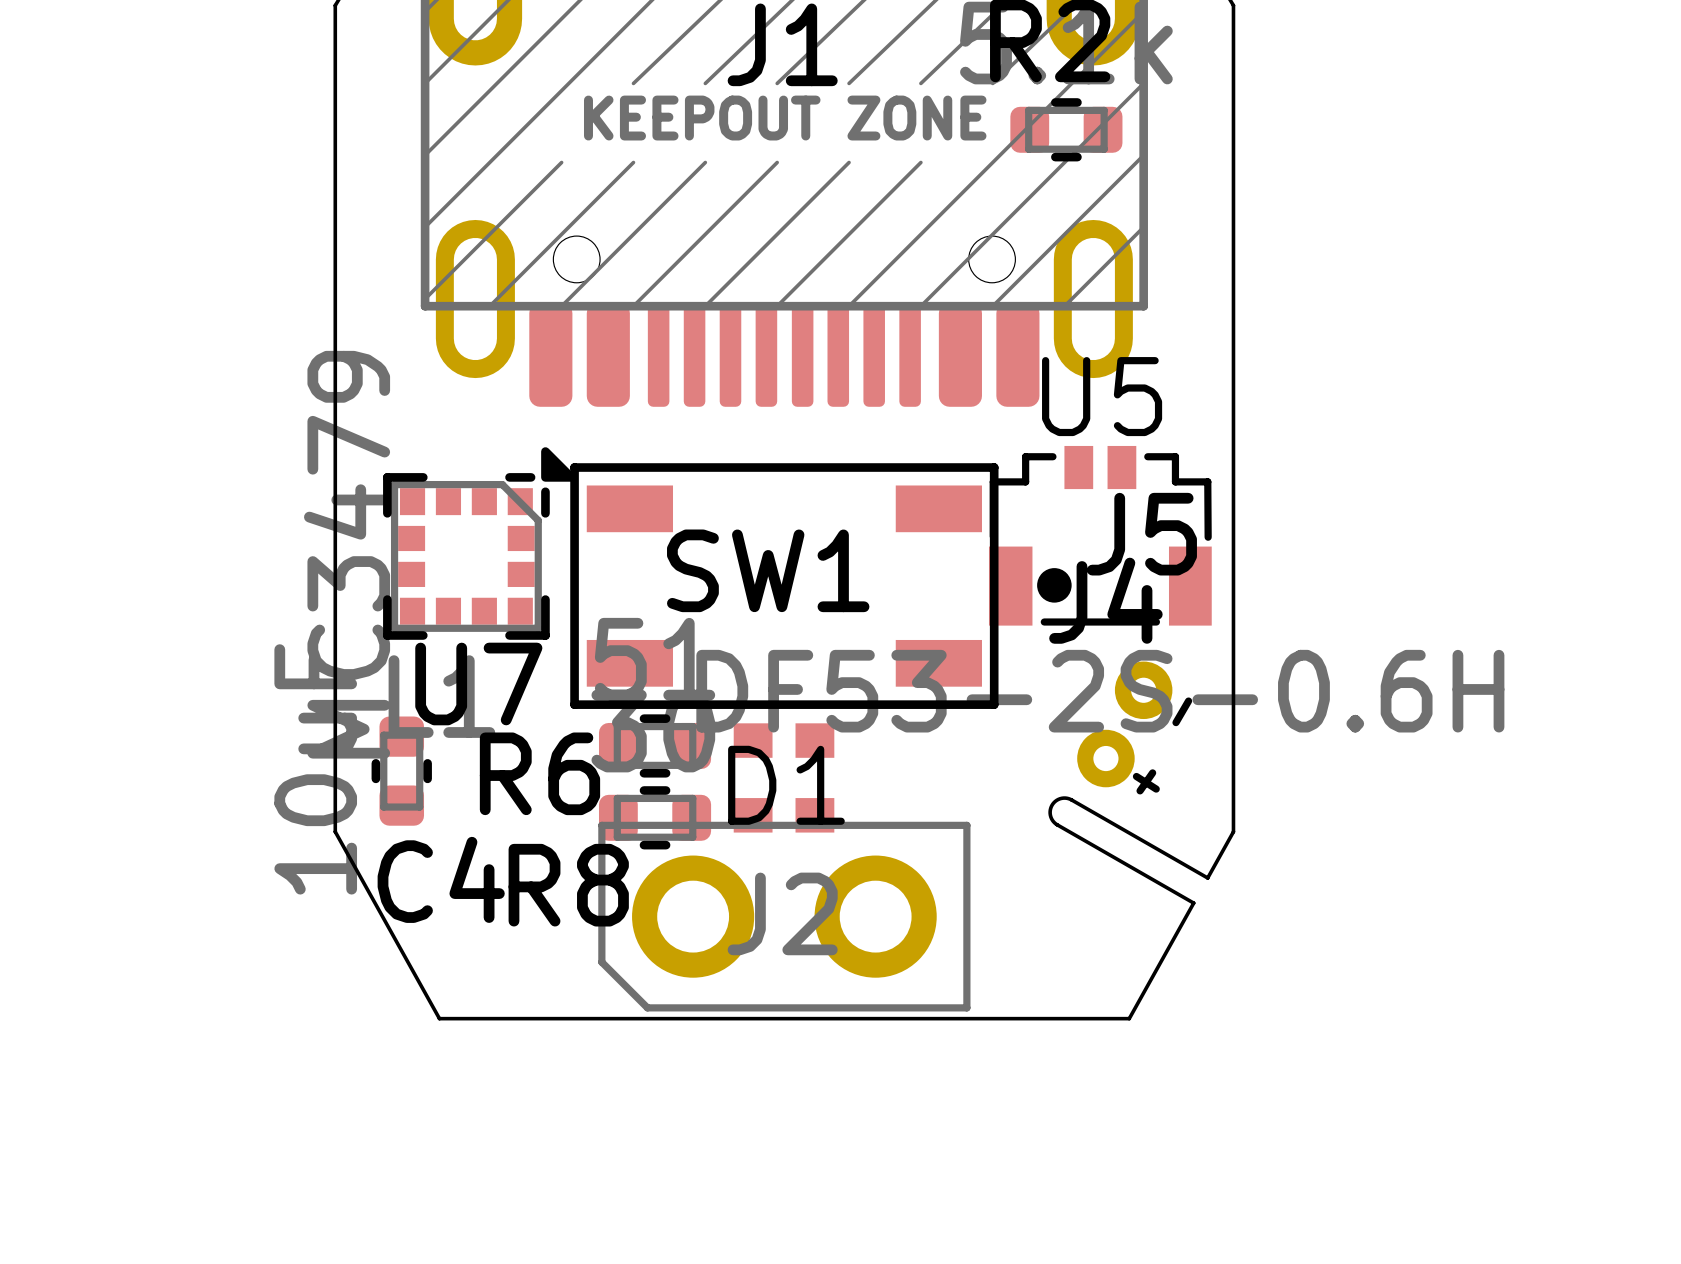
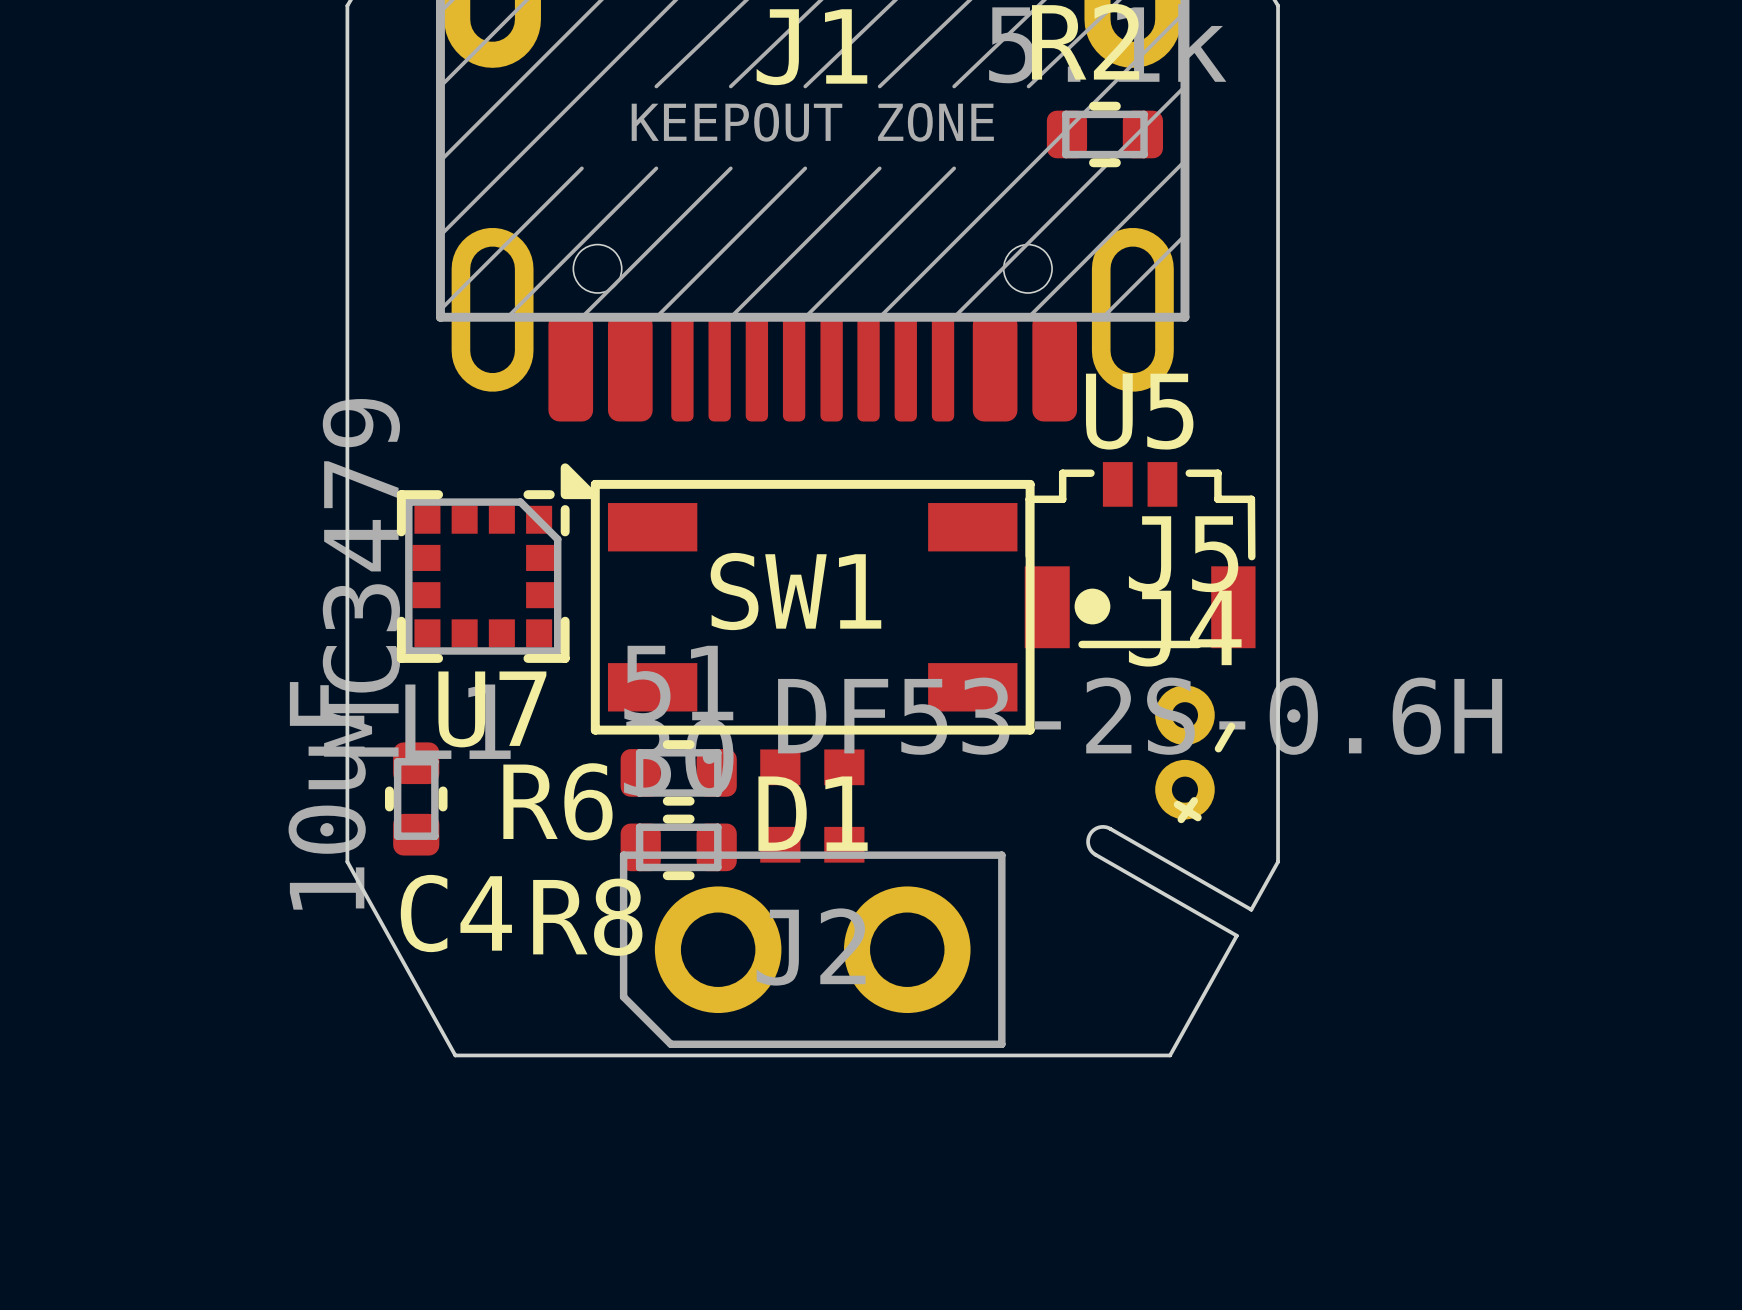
J4 position: (1105, 758) -> (1184, 789)

